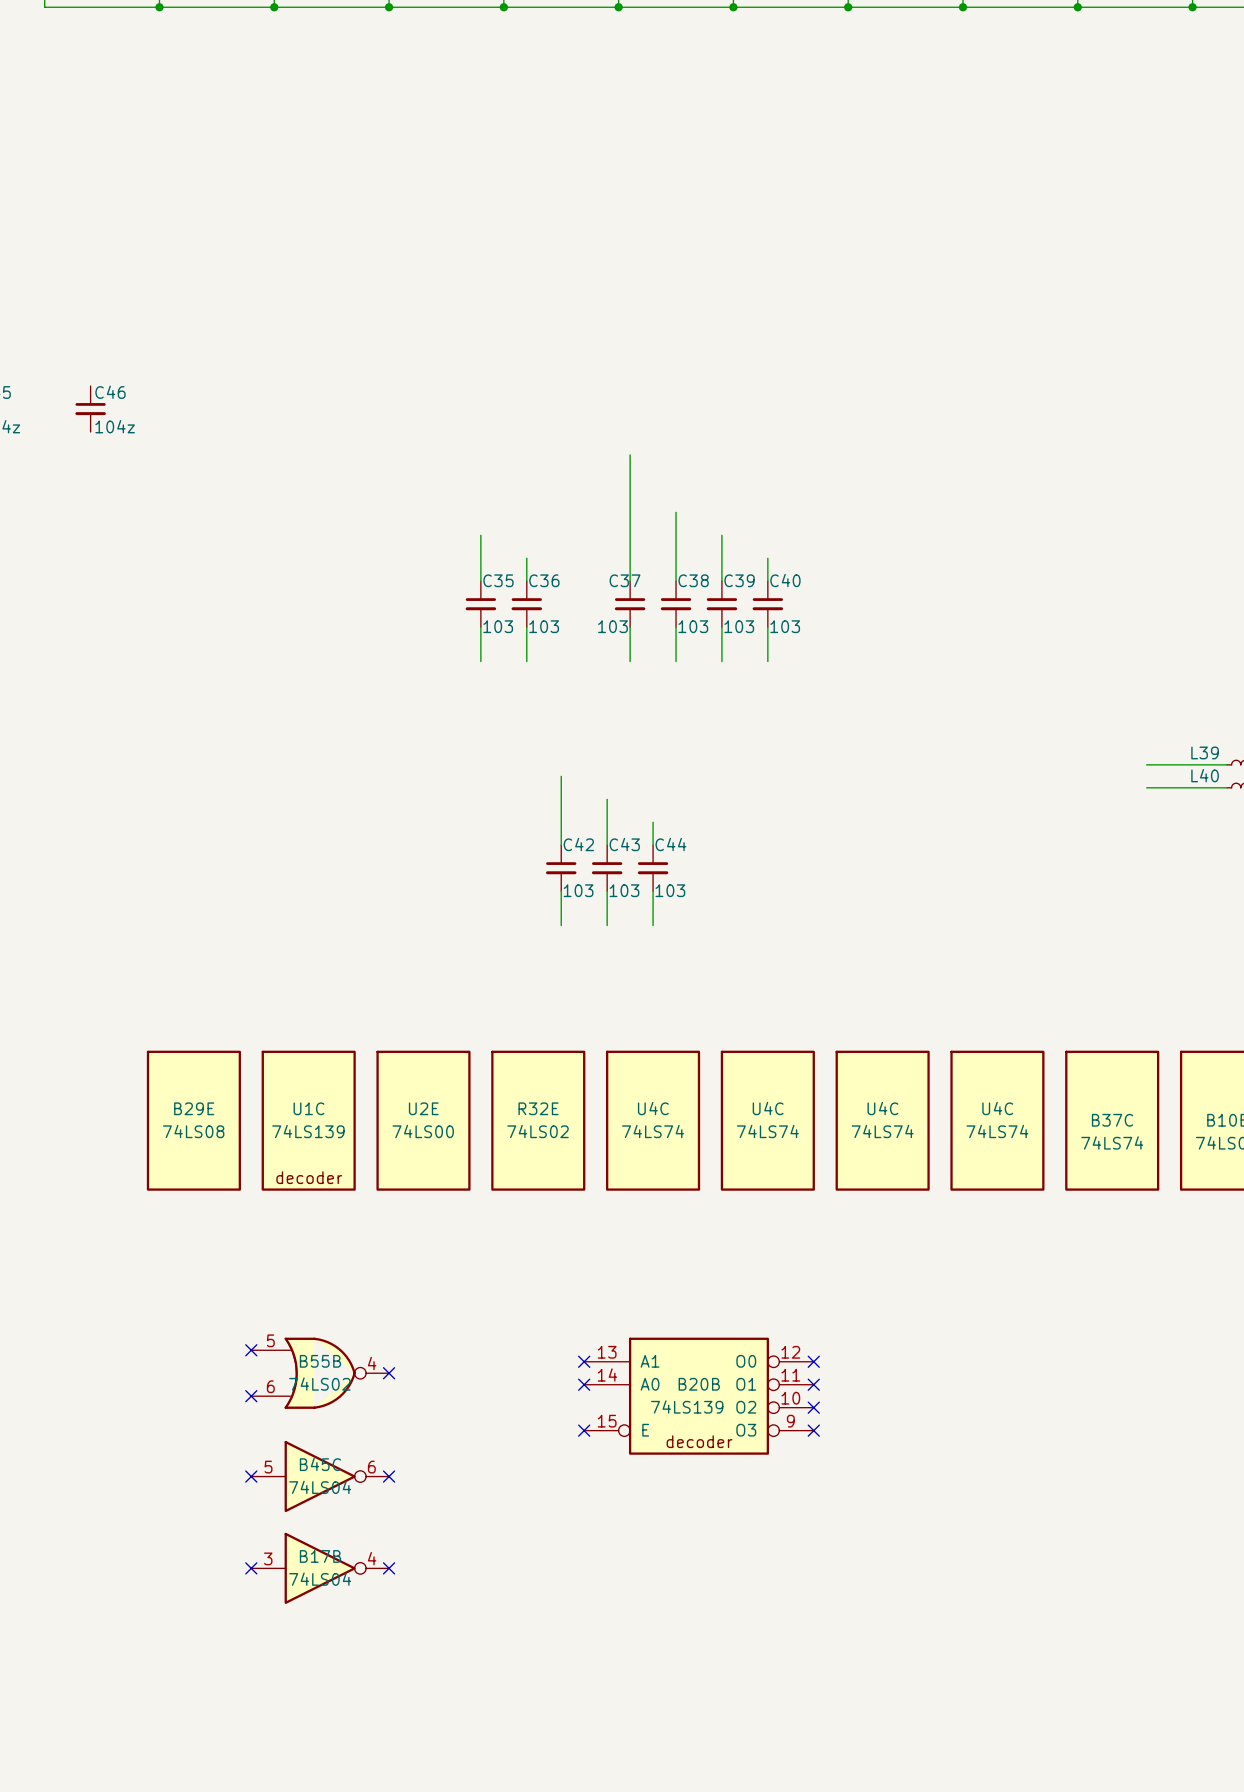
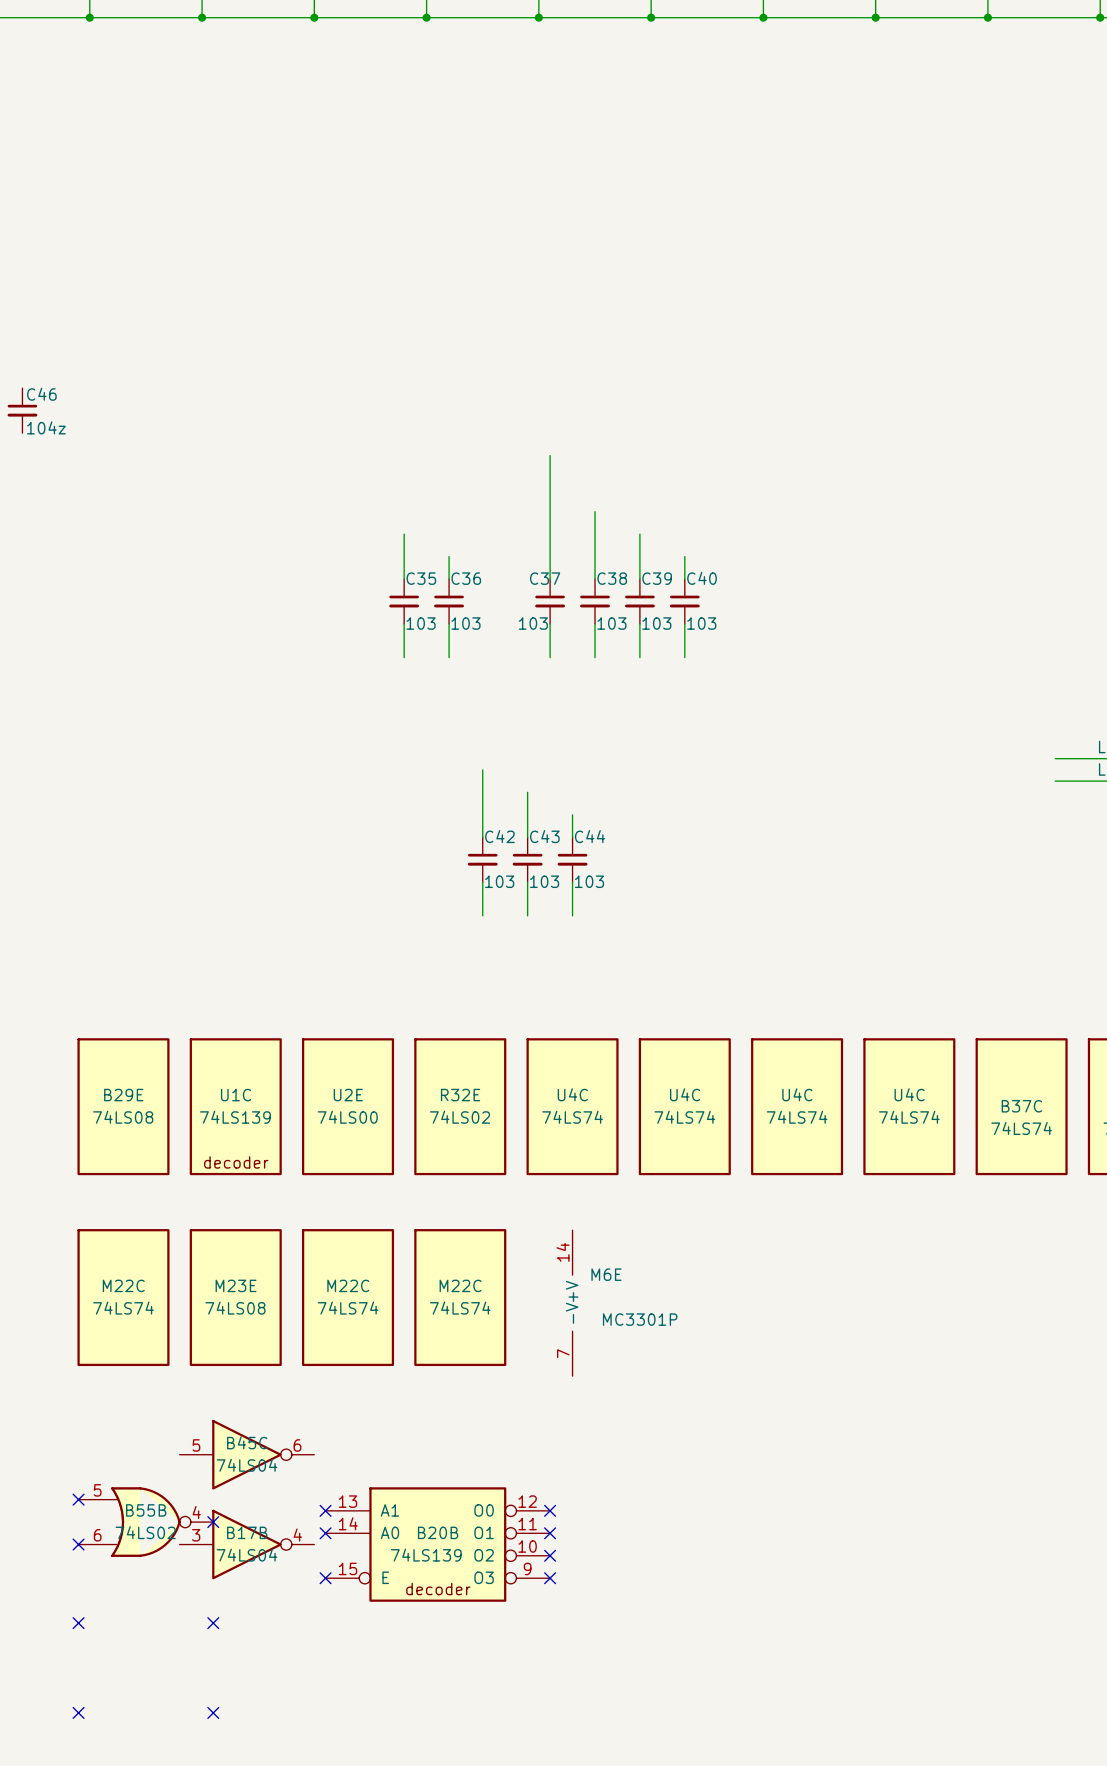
M22C: none -> 74LS74 (123, 1297)
M23E: none -> 74LS08 (235, 1297)
M22C: none -> 74LS74 (348, 1297)
M22C: none -> 74LS74 (460, 1297)
M6E: none -> MC3301P (572, 1303)
no-connect mark: (251, 1350) -> none
no-connect mark: (584, 1361) -> none
no-connect mark: (813, 1361) -> none
B55B position: (320, 1373) -> (145, 1522)
no-connect mark: (389, 1373) -> none
no-connect mark: (584, 1384) -> none
no-connect mark: (813, 1384) -> none
no-connect mark: (251, 1396) -> none
B20B position: (698, 1396) -> (437, 1544)
no-connect mark: (813, 1407) -> none
no-connect mark: (584, 1430) -> none
no-connect mark: (813, 1430) -> none
no-connect mark: (251, 1476) -> none
no-connect mark: (389, 1476) -> none
no-connect mark: none -> (78, 1499)
no-connect mark: none -> (325, 1510)
no-connect mark: none -> (550, 1510)
no-connect mark: none -> (213, 1522)
no-connect mark: none -> (550, 1533)
no-connect mark: none -> (78, 1544)
no-connect mark: (251, 1568) -> none
no-connect mark position: (389, 1568) -> (325, 1533)
no-connect mark: none -> (550, 1555)
no-connect mark: none -> (325, 1578)
no-connect mark: none -> (550, 1578)
no-connect mark: none -> (78, 1623)
no-connect mark: none -> (213, 1623)
no-connect mark: none -> (78, 1712)
no-connect mark: none -> (213, 1712)

